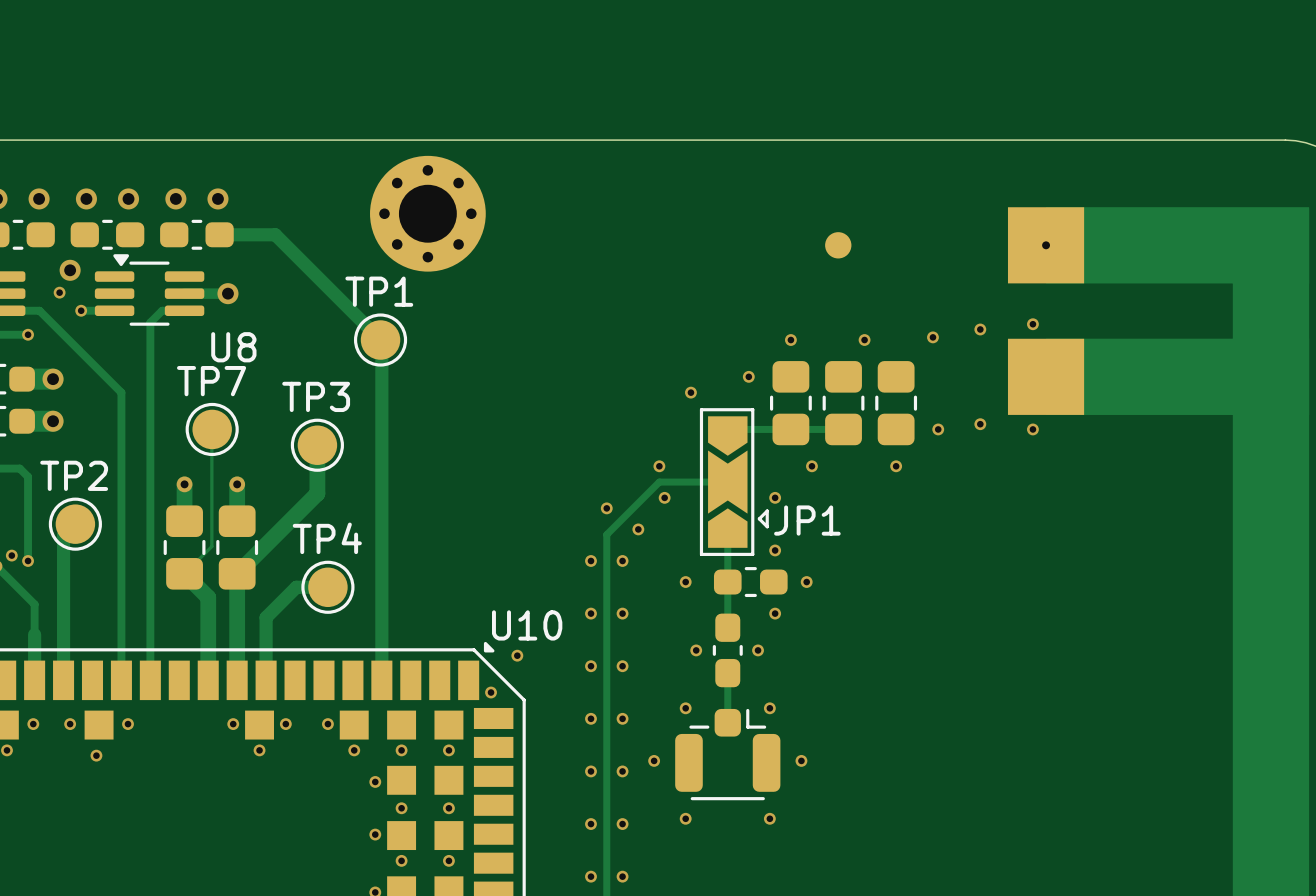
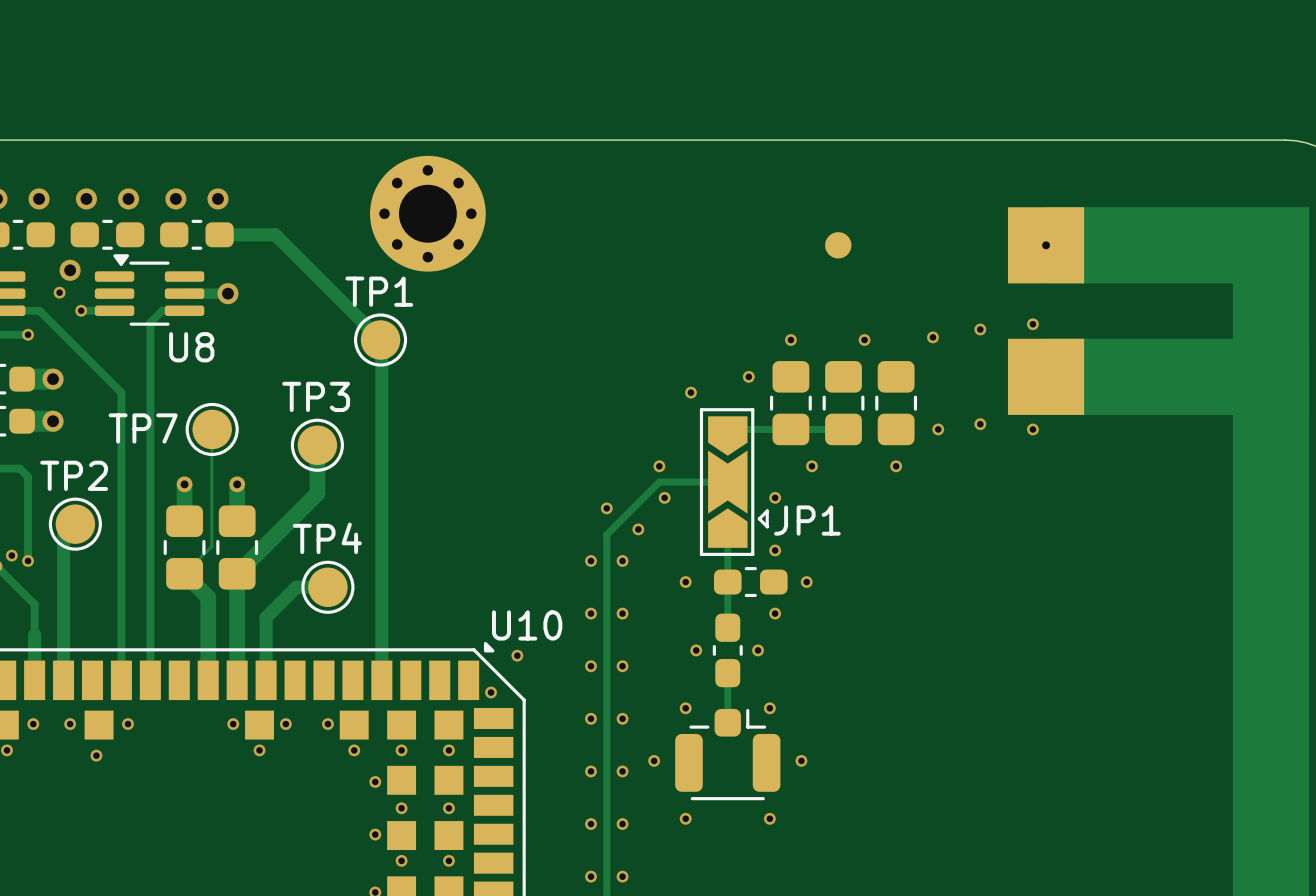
U8 name position: U8 (233, 347) -> U8 (191, 347)
TP7 name position: TP7 (211, 381) -> TP7 (143, 428)

